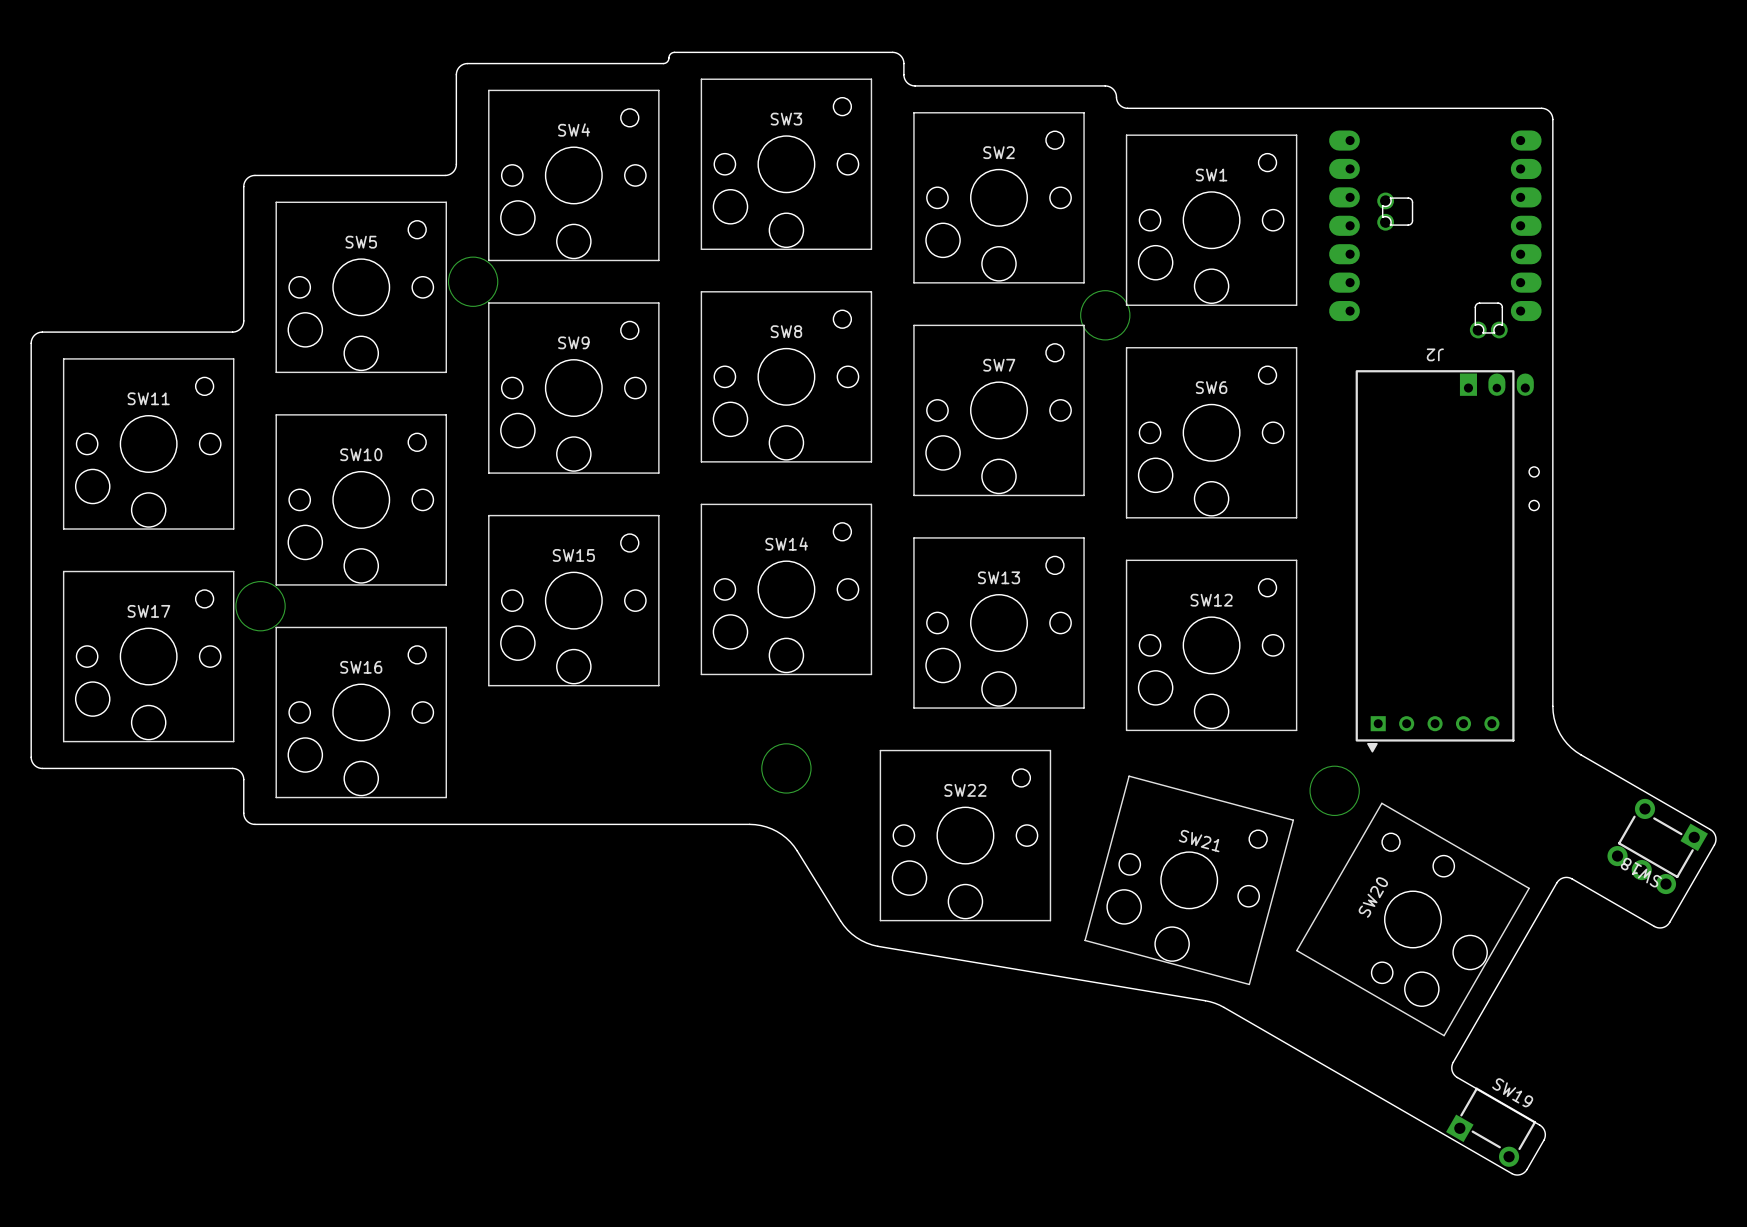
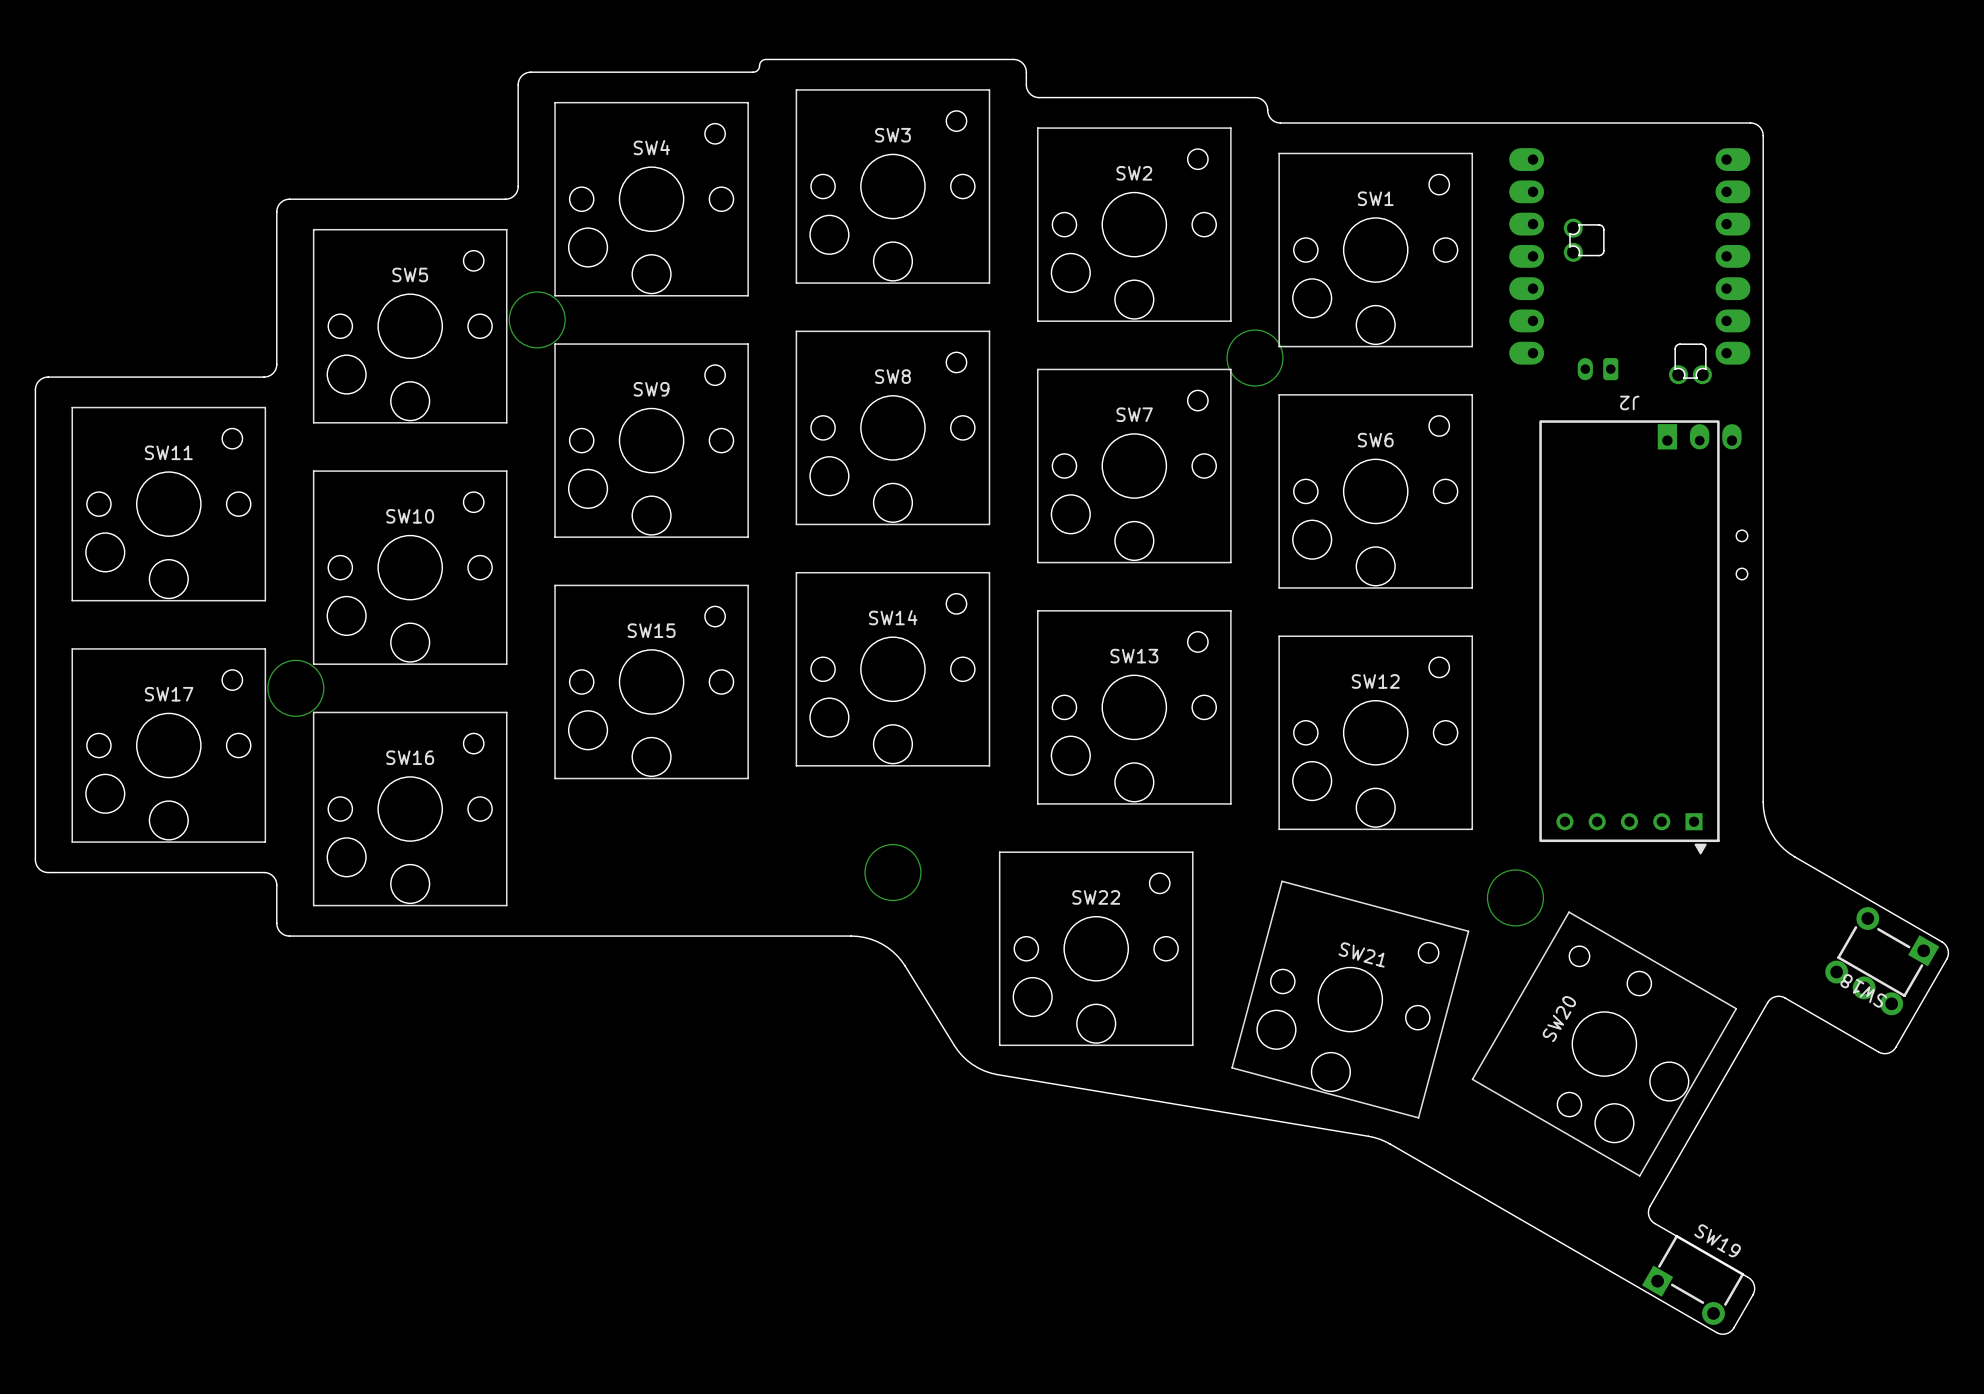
part: none -> (1598, 369)
J2 footprint: [1355, 370, 1515, 753] -> [1539, 420, 1720, 855]

